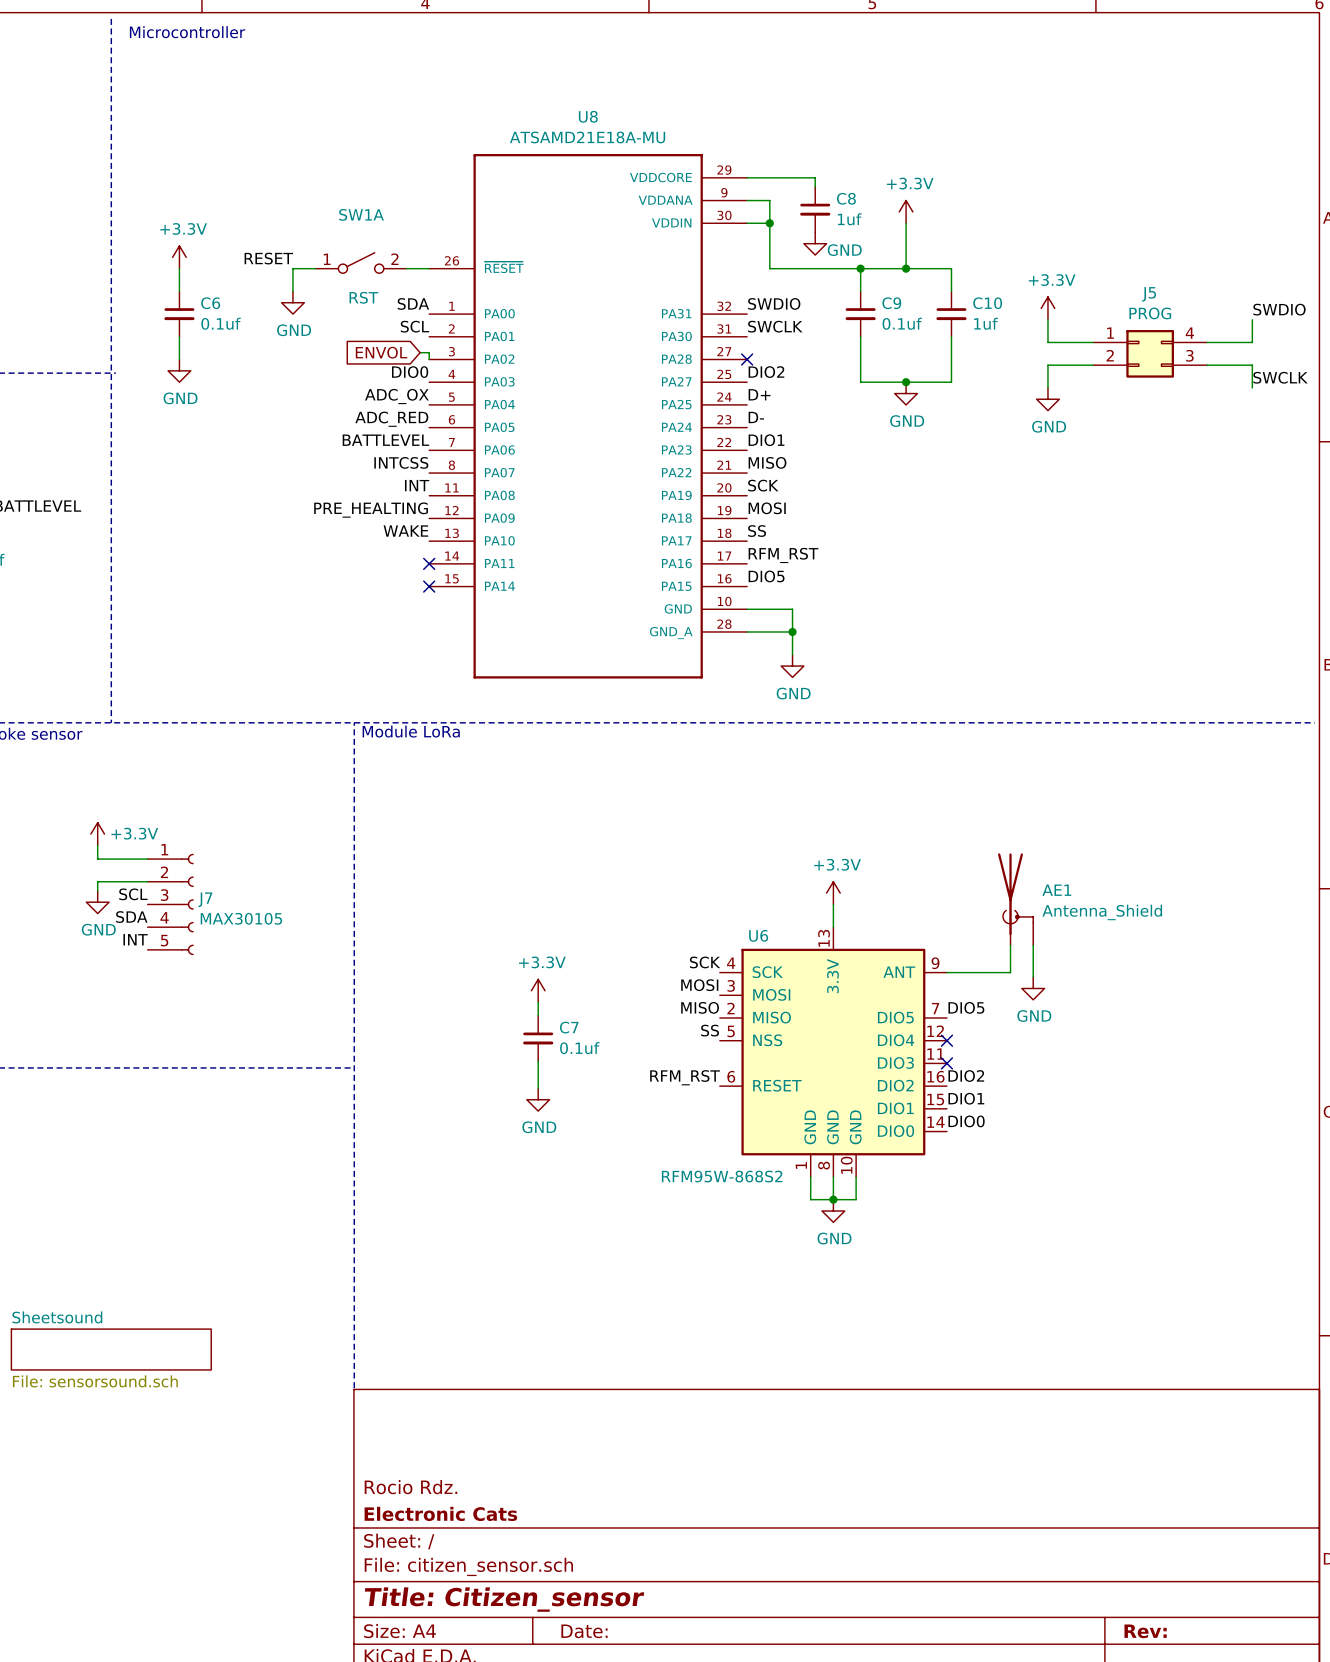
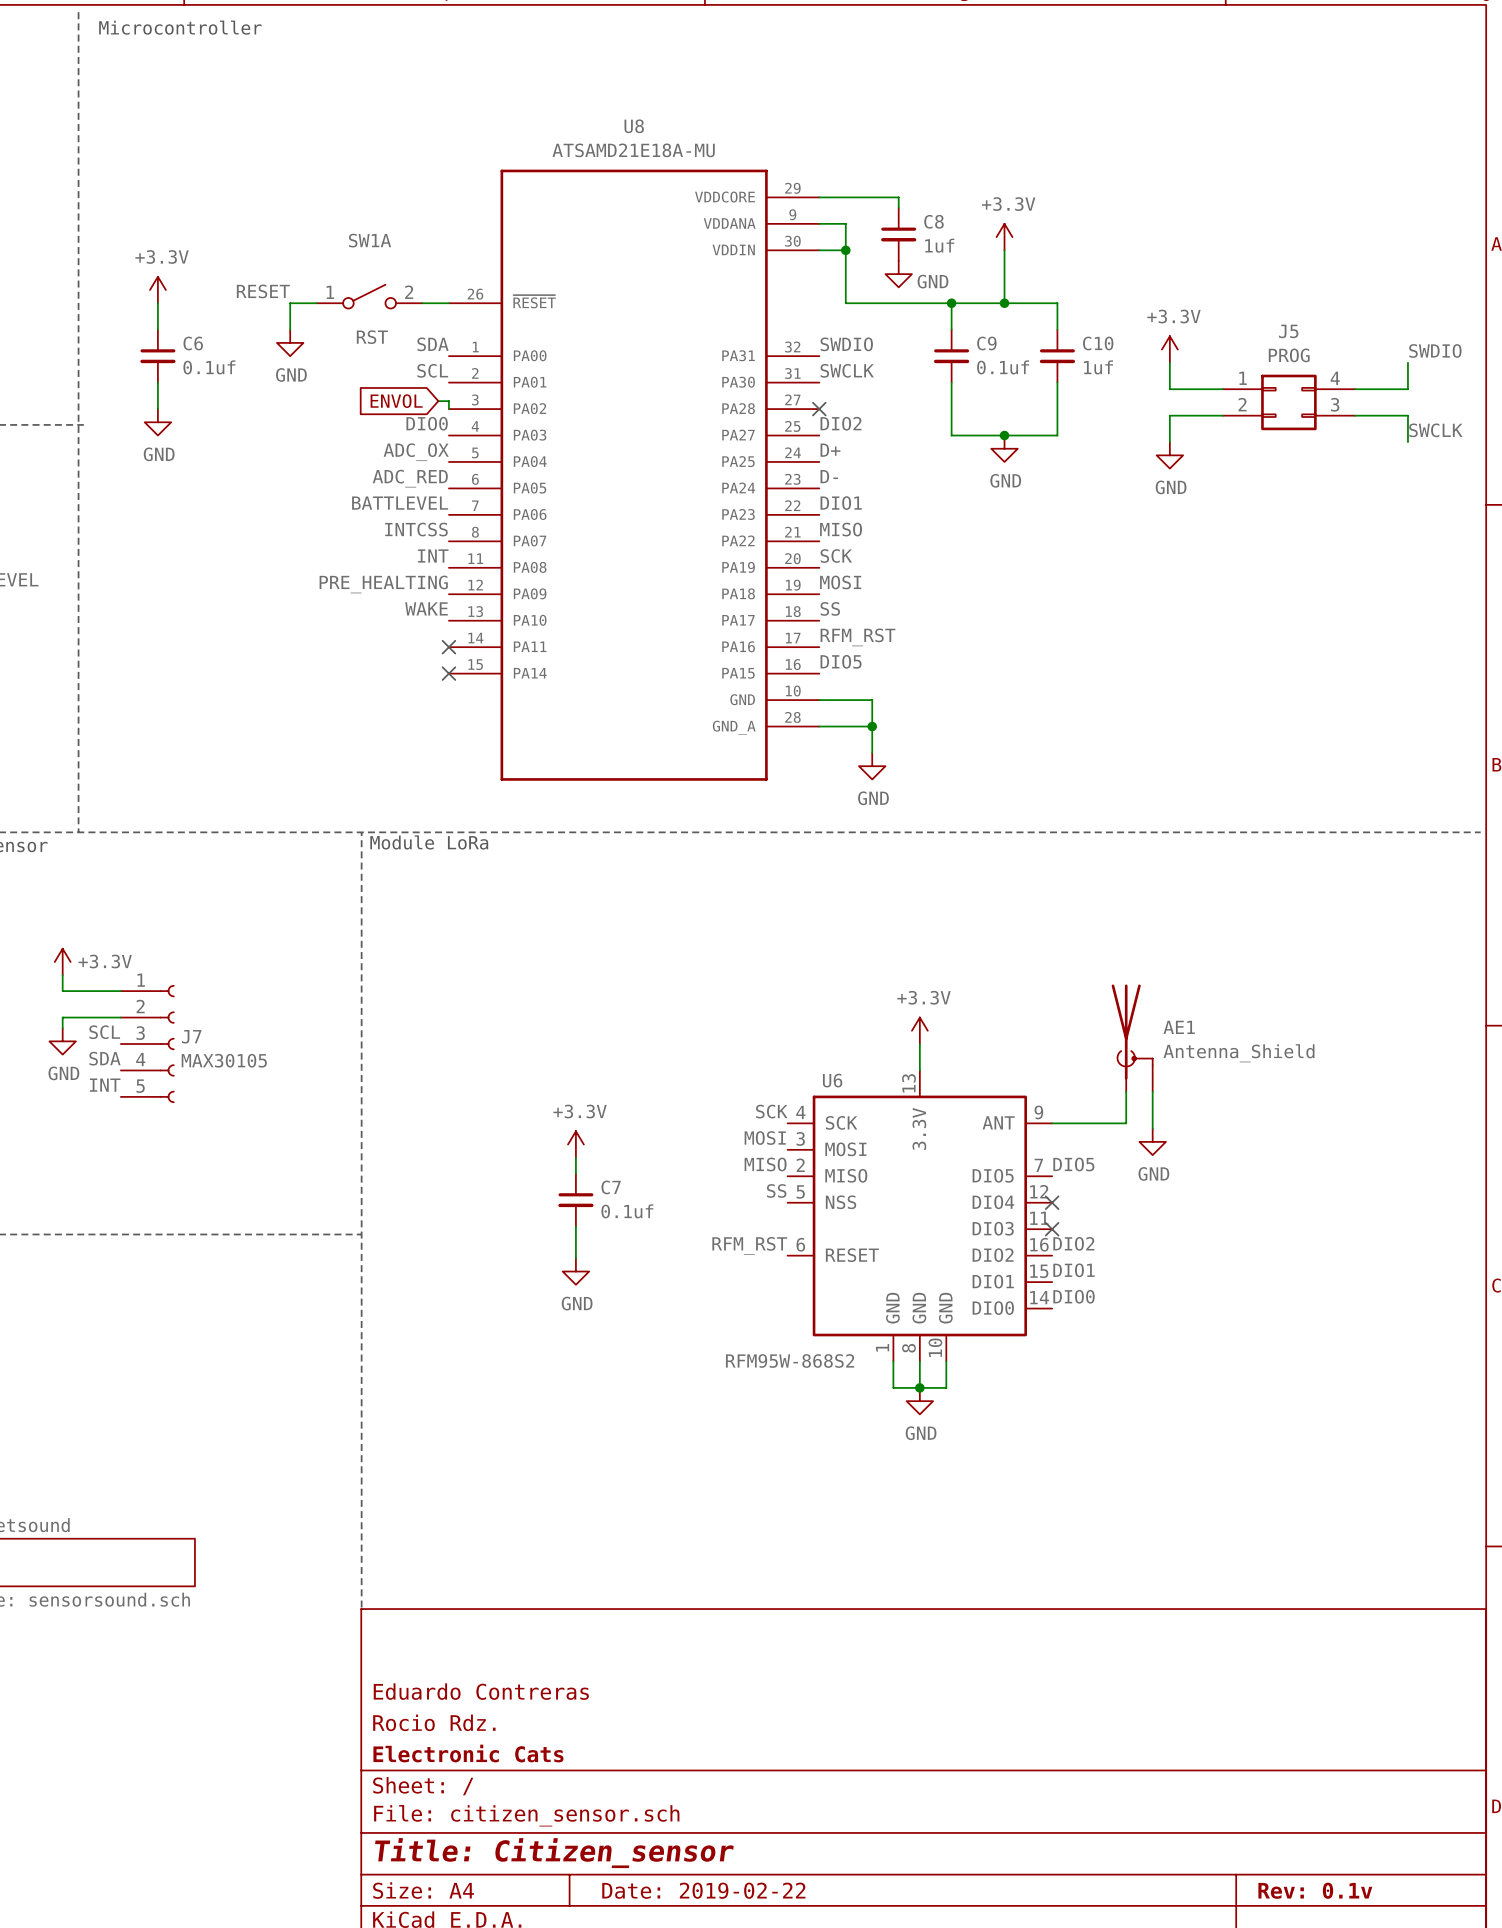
title block: none -> Eduardo Contreras (481, 1691)
title block: Date: (584, 1631) -> Date: 2019-02-22 (703, 1890)
title block: Rev: (1145, 1631) -> Rev: 0.1v (1315, 1890)

